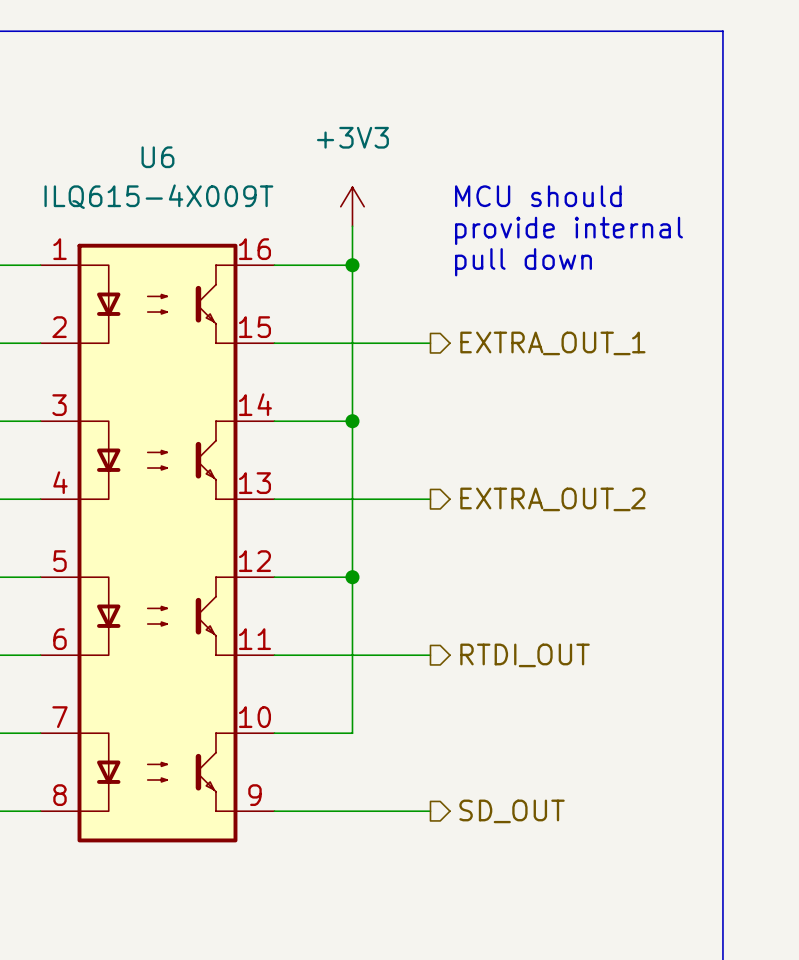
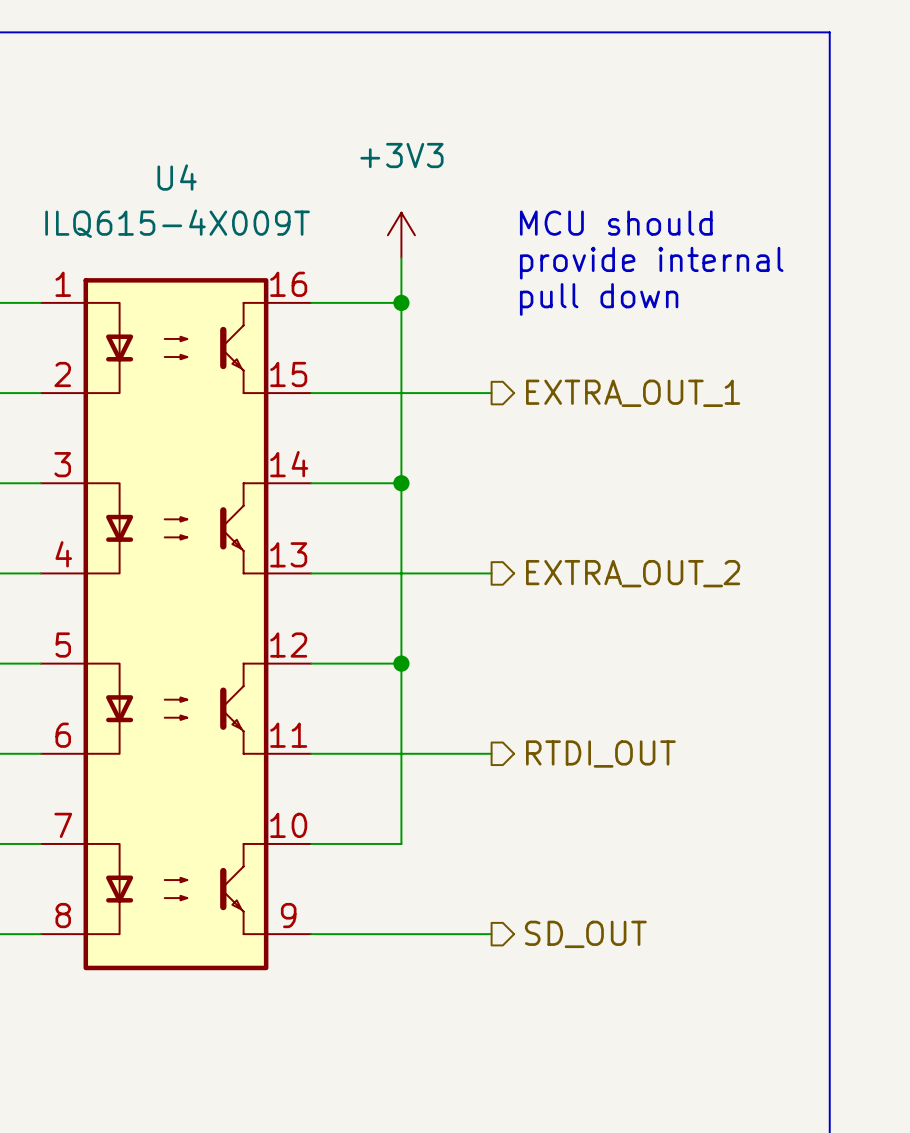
U6 name: U6 (157, 157) -> U4 (177, 177)

